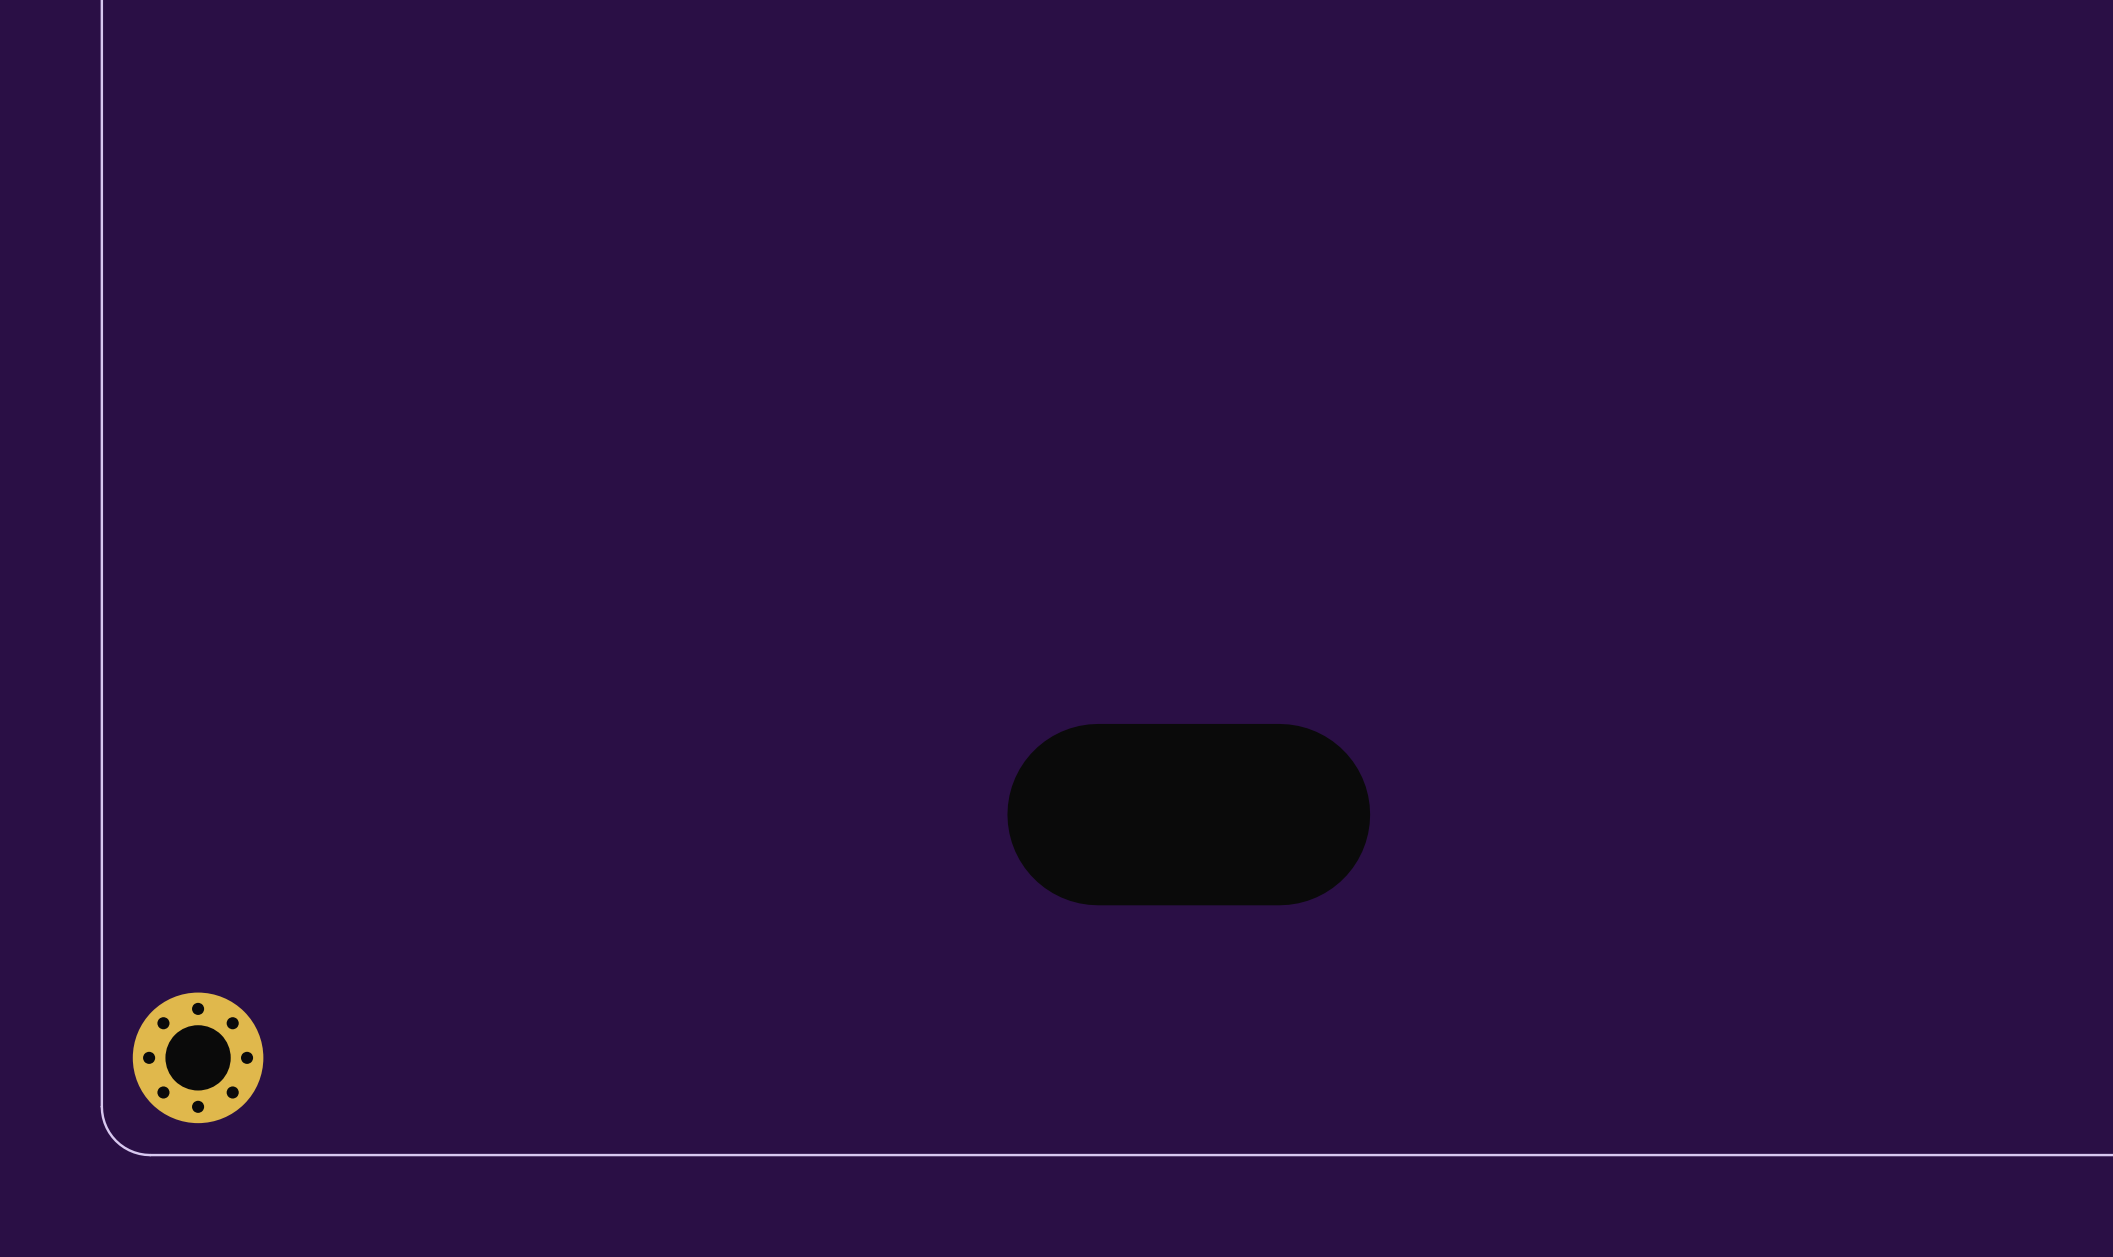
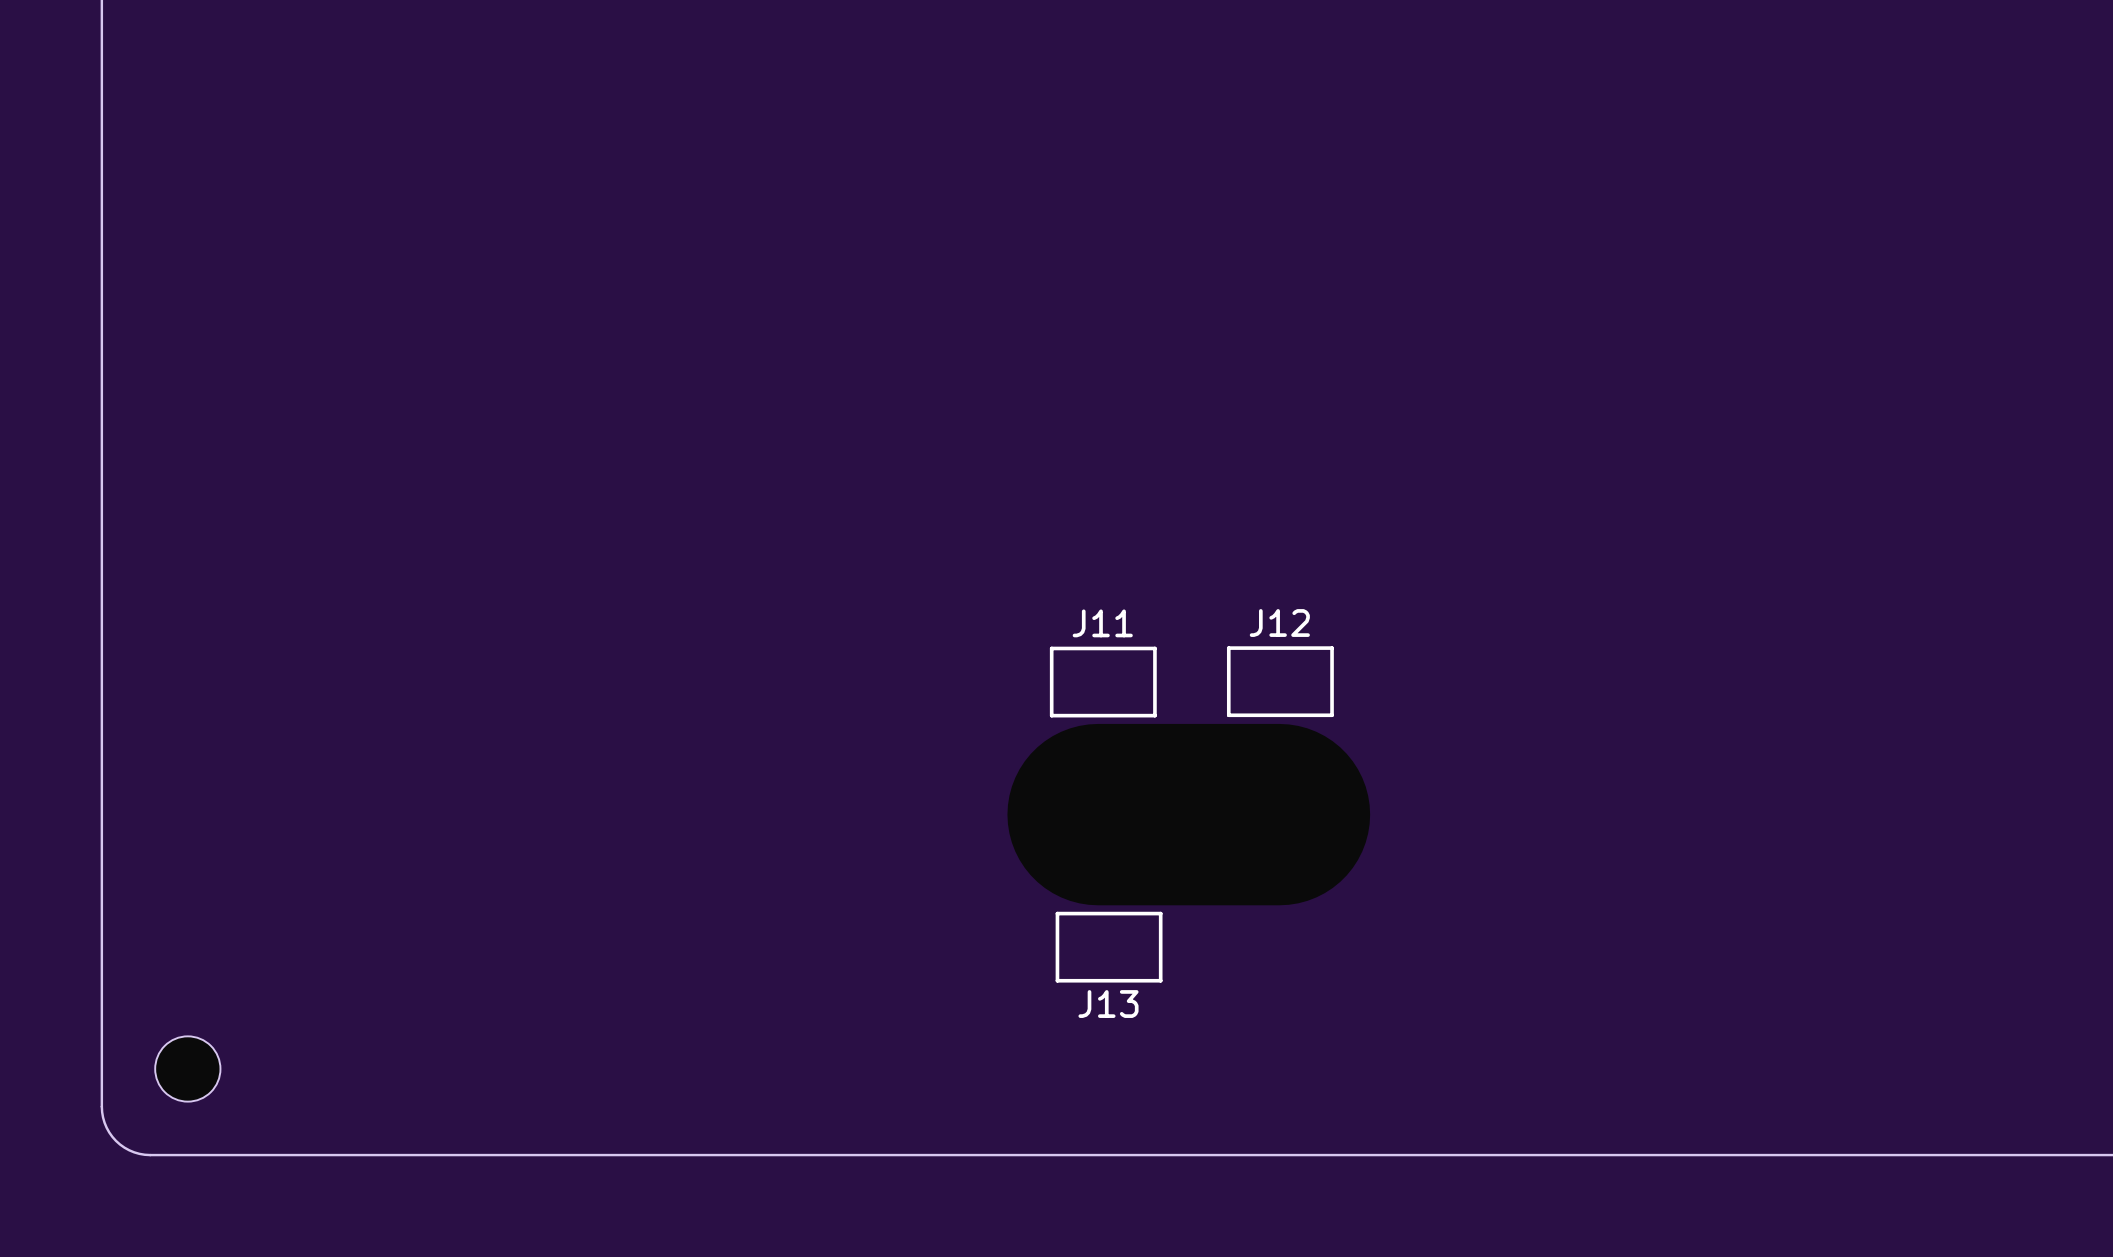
text: none -> J11 (1102, 623)
text: none -> J12 (1279, 623)
line: none -> (1051, 648) (1154, 648) (1154, 715) (1051, 715) (1051, 648)
line: none -> (1228, 648) (1332, 648) (1332, 715) (1228, 715) (1228, 648)
line: none -> (1057, 913) (1160, 913) (1160, 980) (1057, 980) (1057, 913)
part footprint: [132, 992, 264, 1124] -> [155, 1036, 221, 1102]
text: none -> J13 (1108, 1004)

